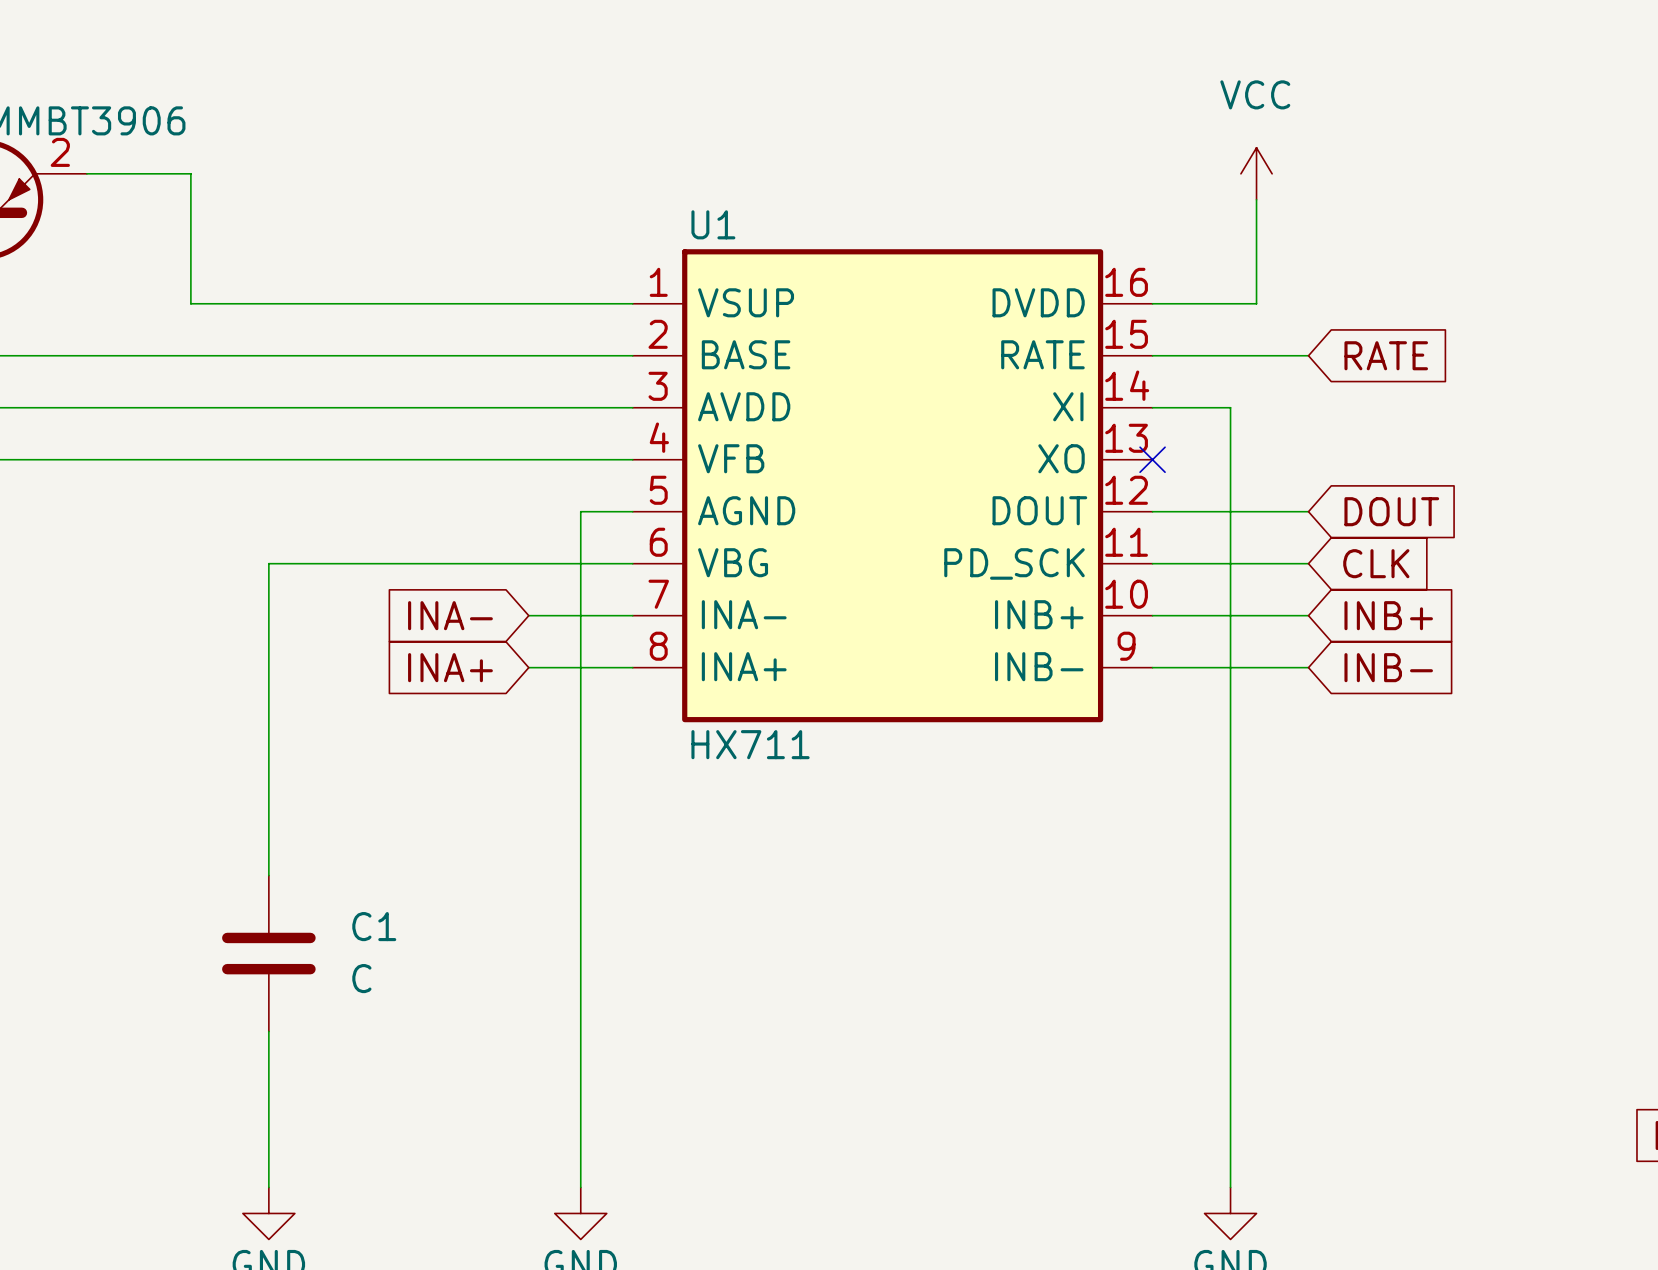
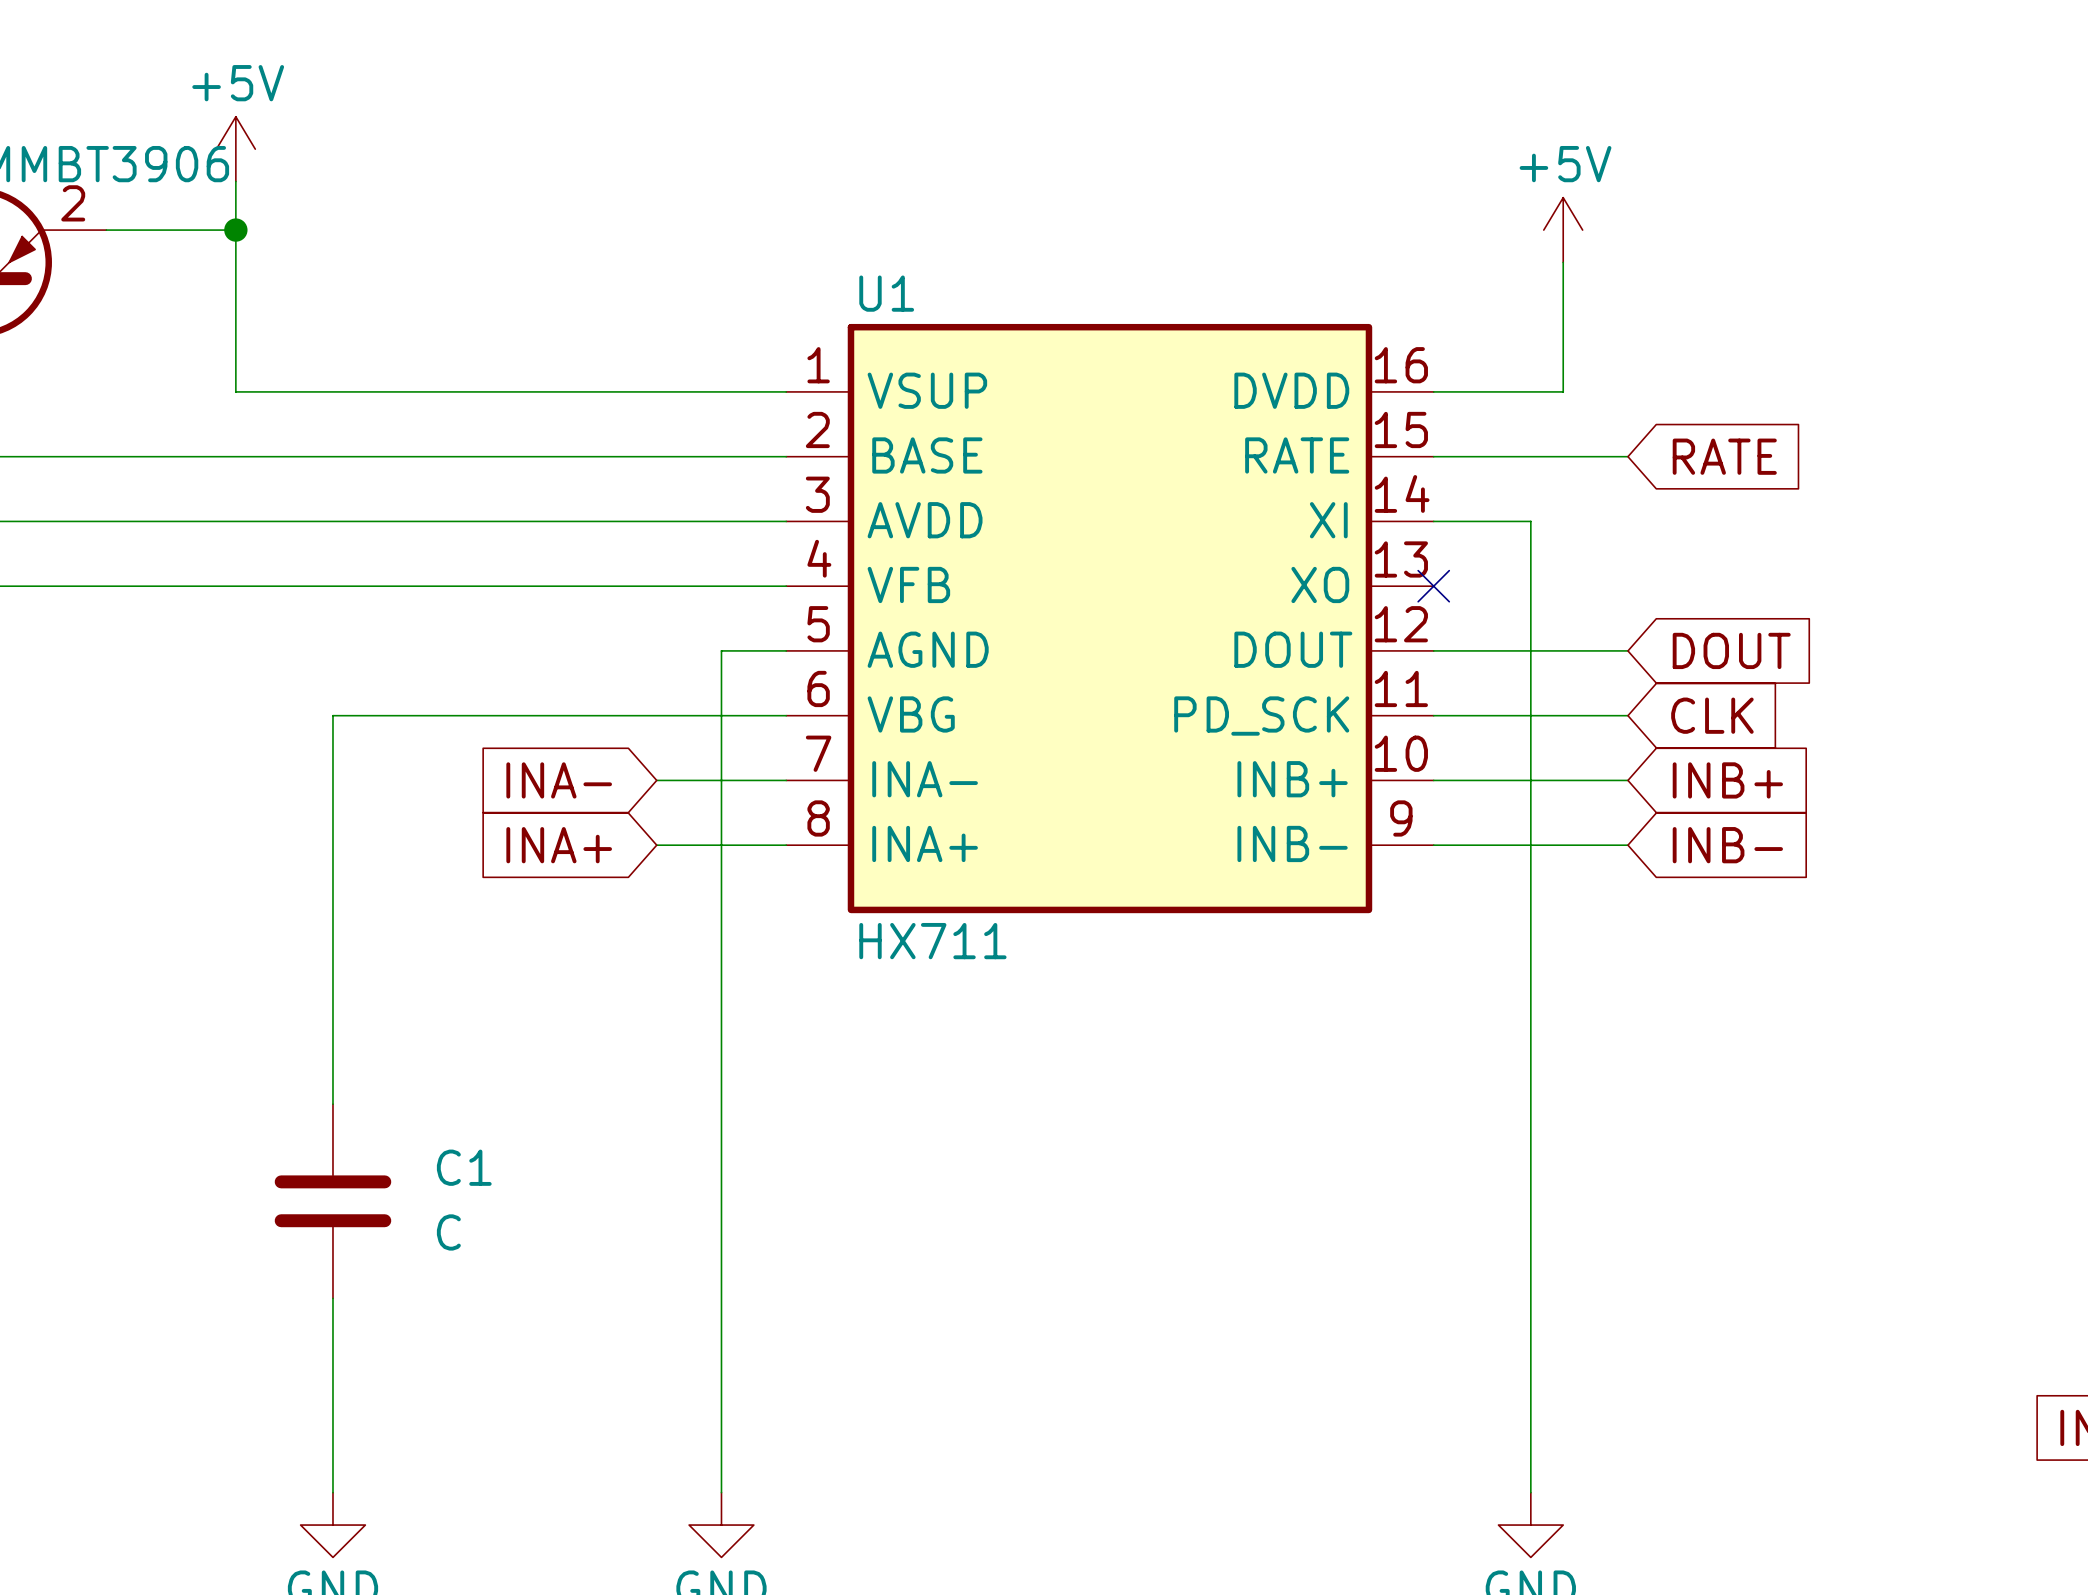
power symbol: none -> +5V (235, 149)
wire: none -> (235, 181) (235, 230)
junction: none -> (235, 230)
power symbol: VCC (1256, 173) -> +5V (1563, 230)

